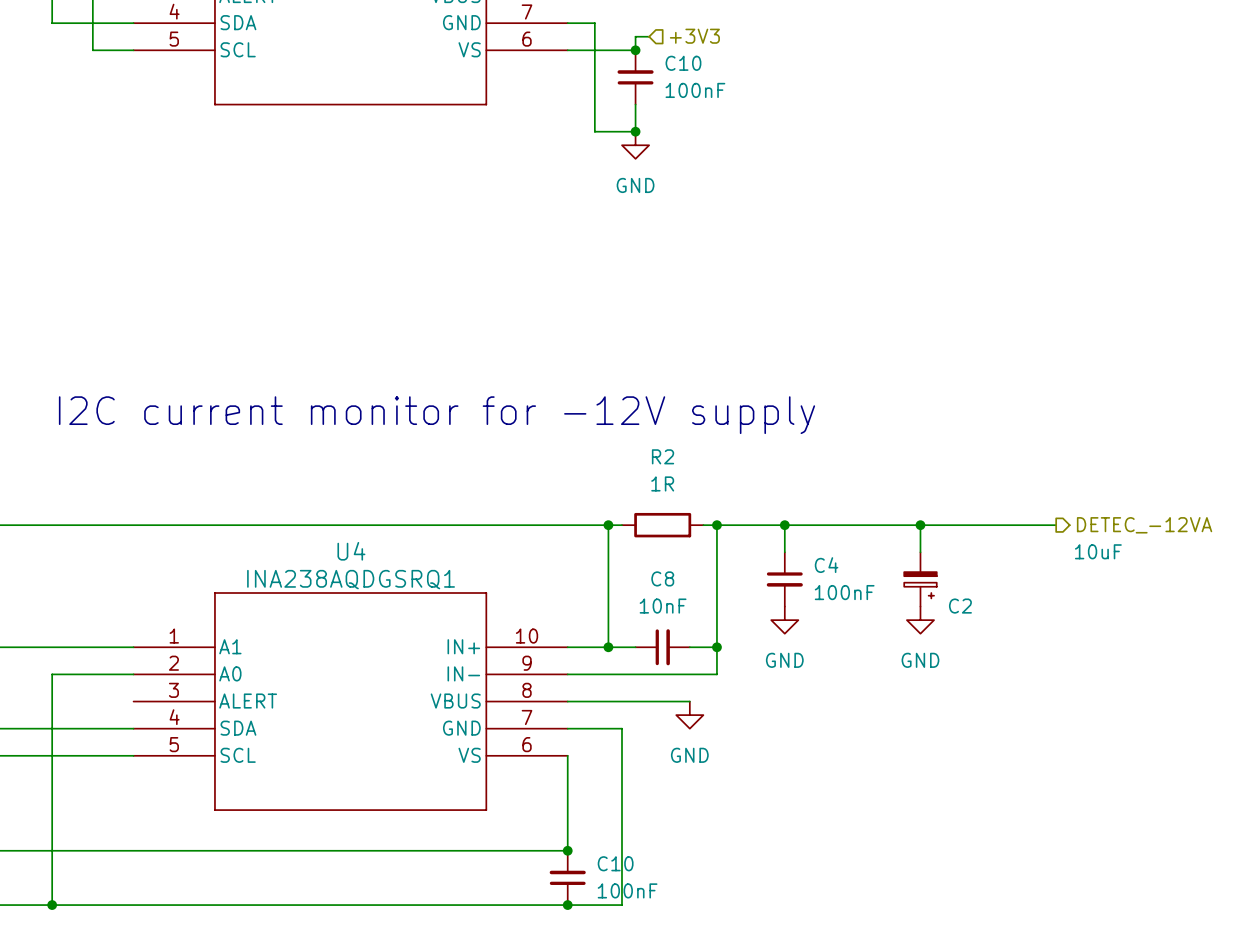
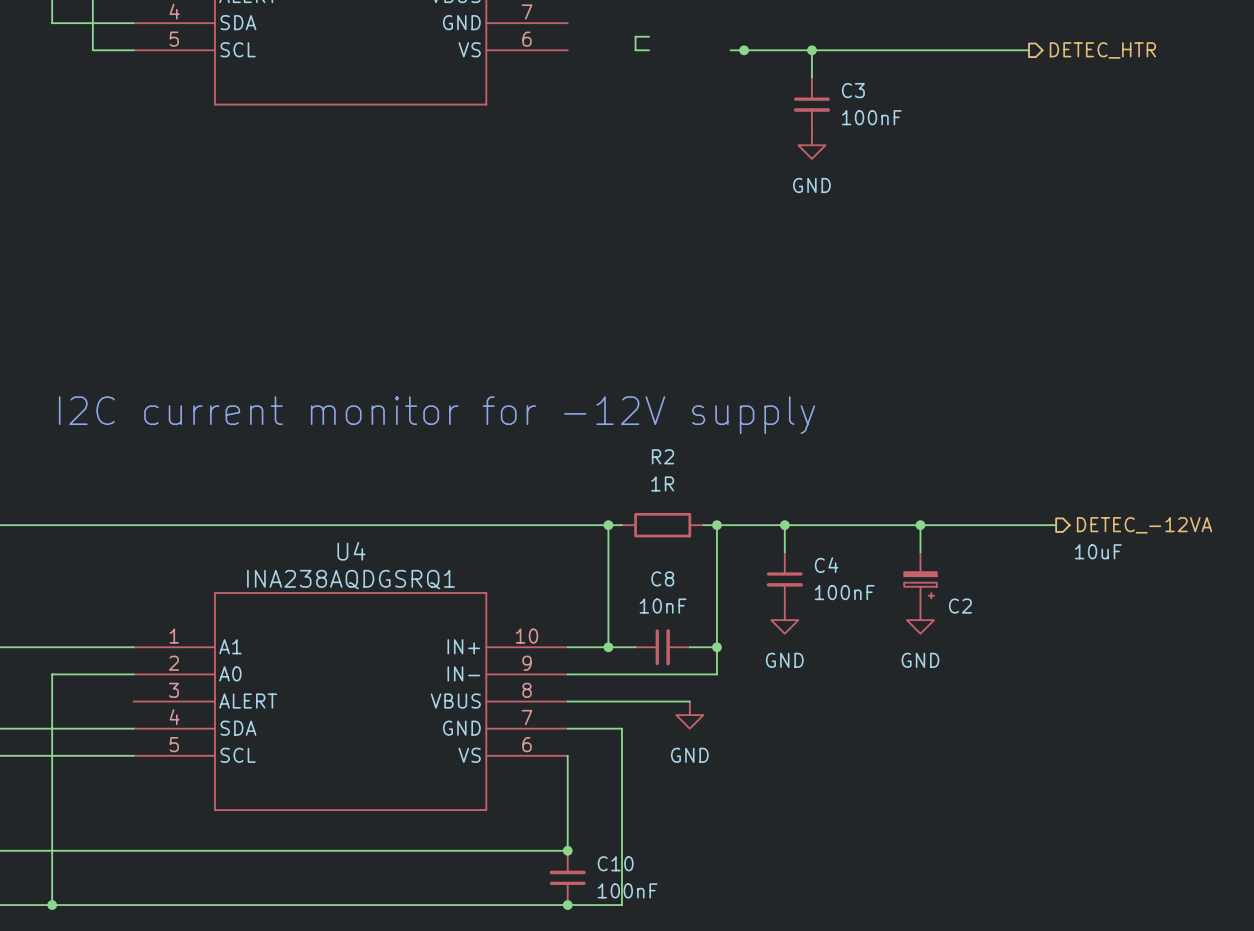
wire: (567, 23) (594, 23) (594, 131) (635, 131) (635, 104) -> none
hierarchical label: +3V3 (694, 36) -> none
wire: (567, 50) (635, 50) -> (649, 50) (635, 50)
junction: (635, 50) -> none
wire: none -> (730, 50) (1029, 50)
junction: none -> (744, 50)
wire: none -> (811, 50) (811, 77)
junction: none -> (811, 50)
hierarchical label: none -> DETEC_HTR (1102, 50)
C10: 100nF (635, 77) -> none
C3: none -> 100nF (811, 104)
junction: (635, 131) -> none
power symbol: GND (635, 145) -> none
power symbol: none -> GND (811, 145)

